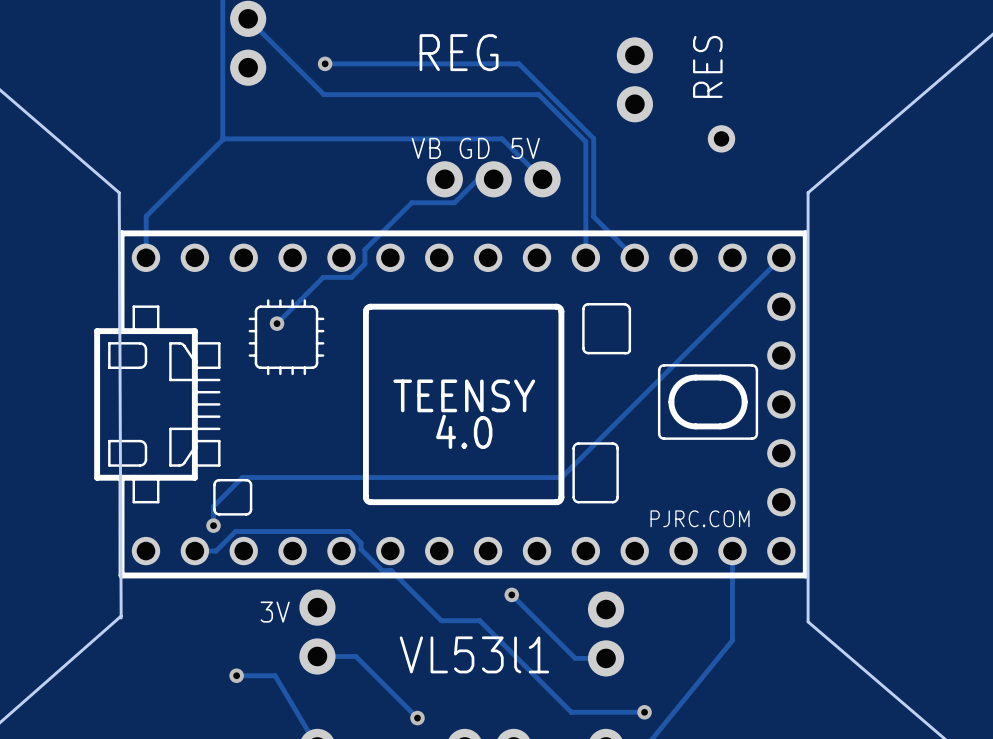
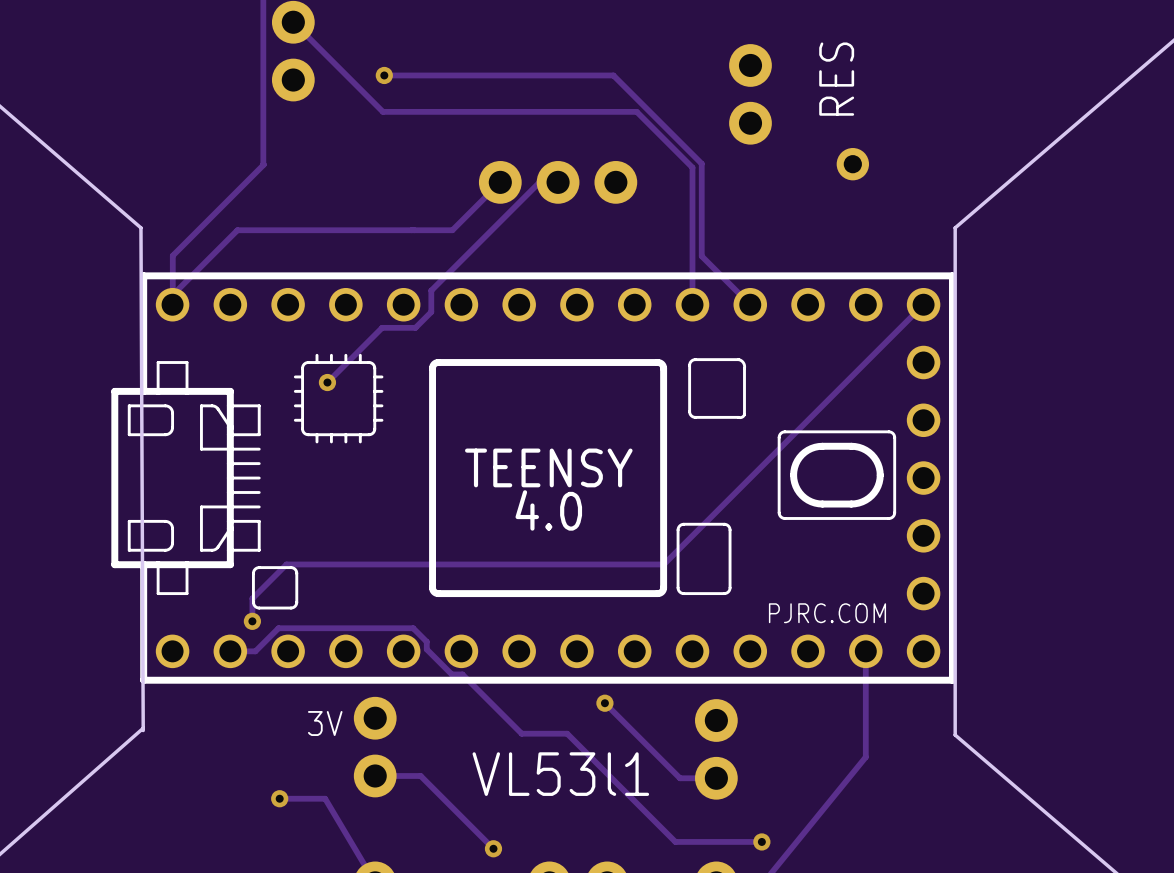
text: REG (459, 52) -> none
track: (222, 138) (502, 138) (542, 179) -> none
text: VB (426, 148) -> none
text: GD (474, 148) -> none
text: 5V (525, 148) -> none
track: none -> (500, 182) (452, 230) (237, 230) (172, 295)
track: (493, 179) (477, 179) (454, 202) (411, 202) (364, 249) -> (558, 182) (539, 182) (431, 290) (431, 295)
part position: (493, 179) -> (558, 182)

